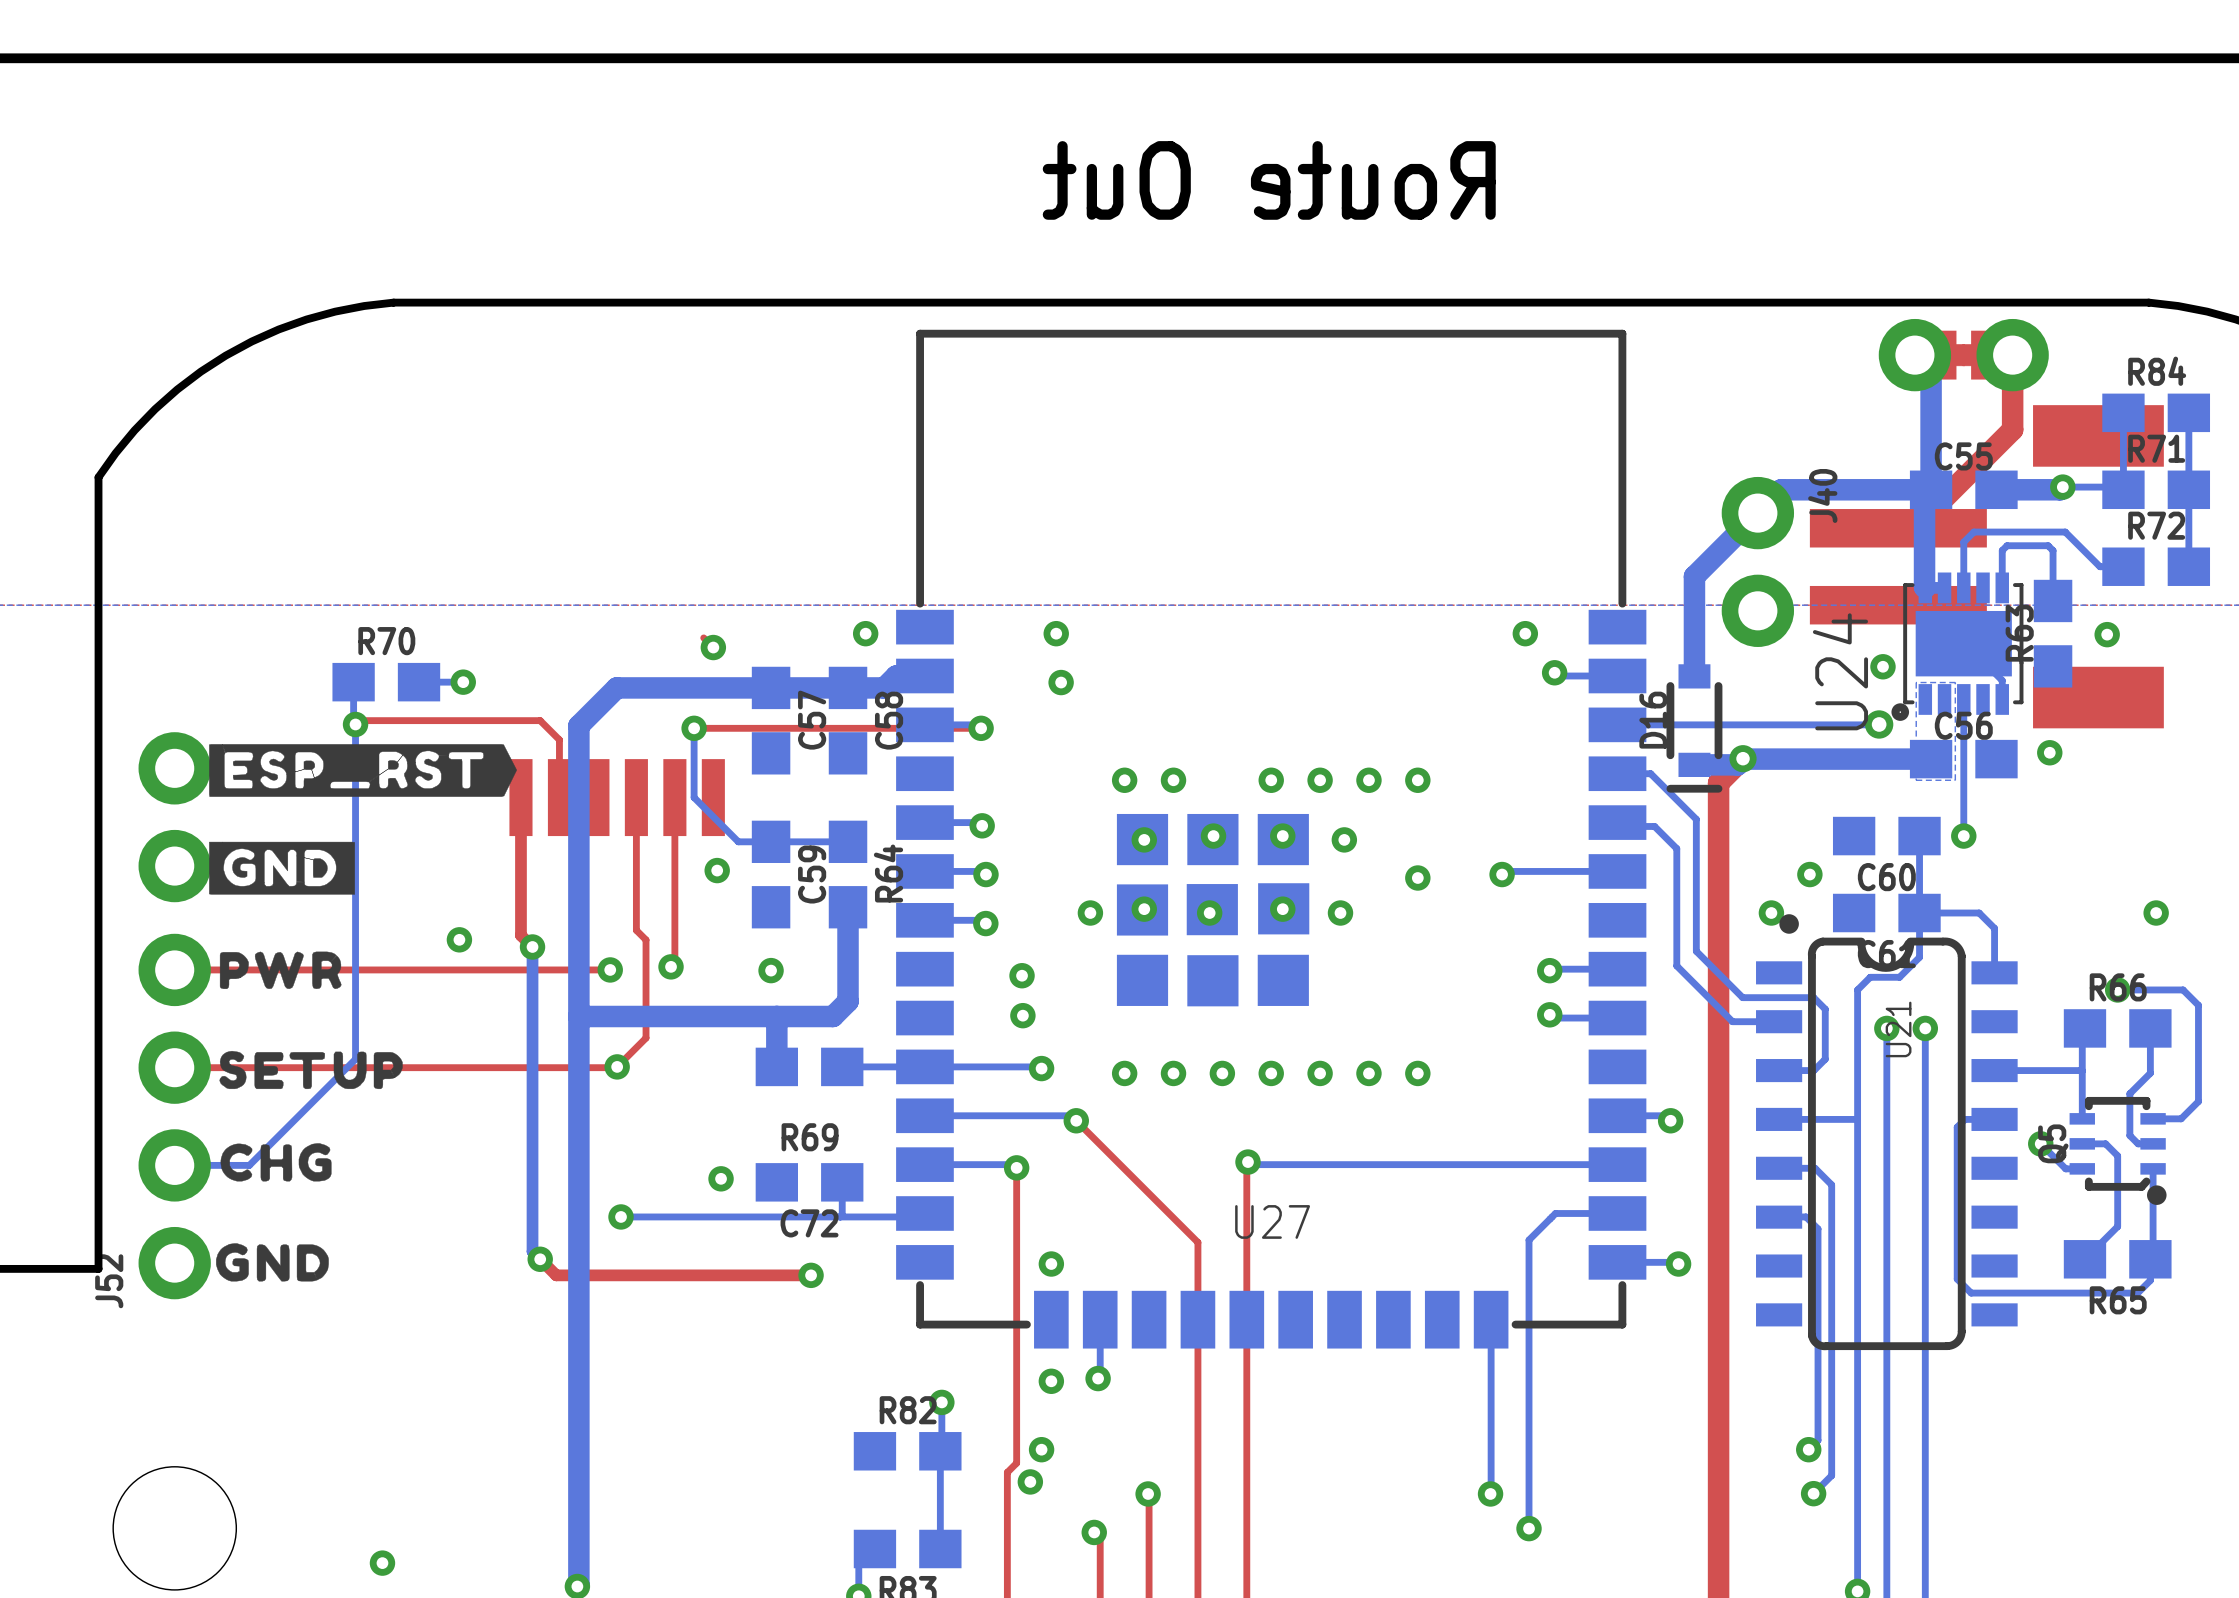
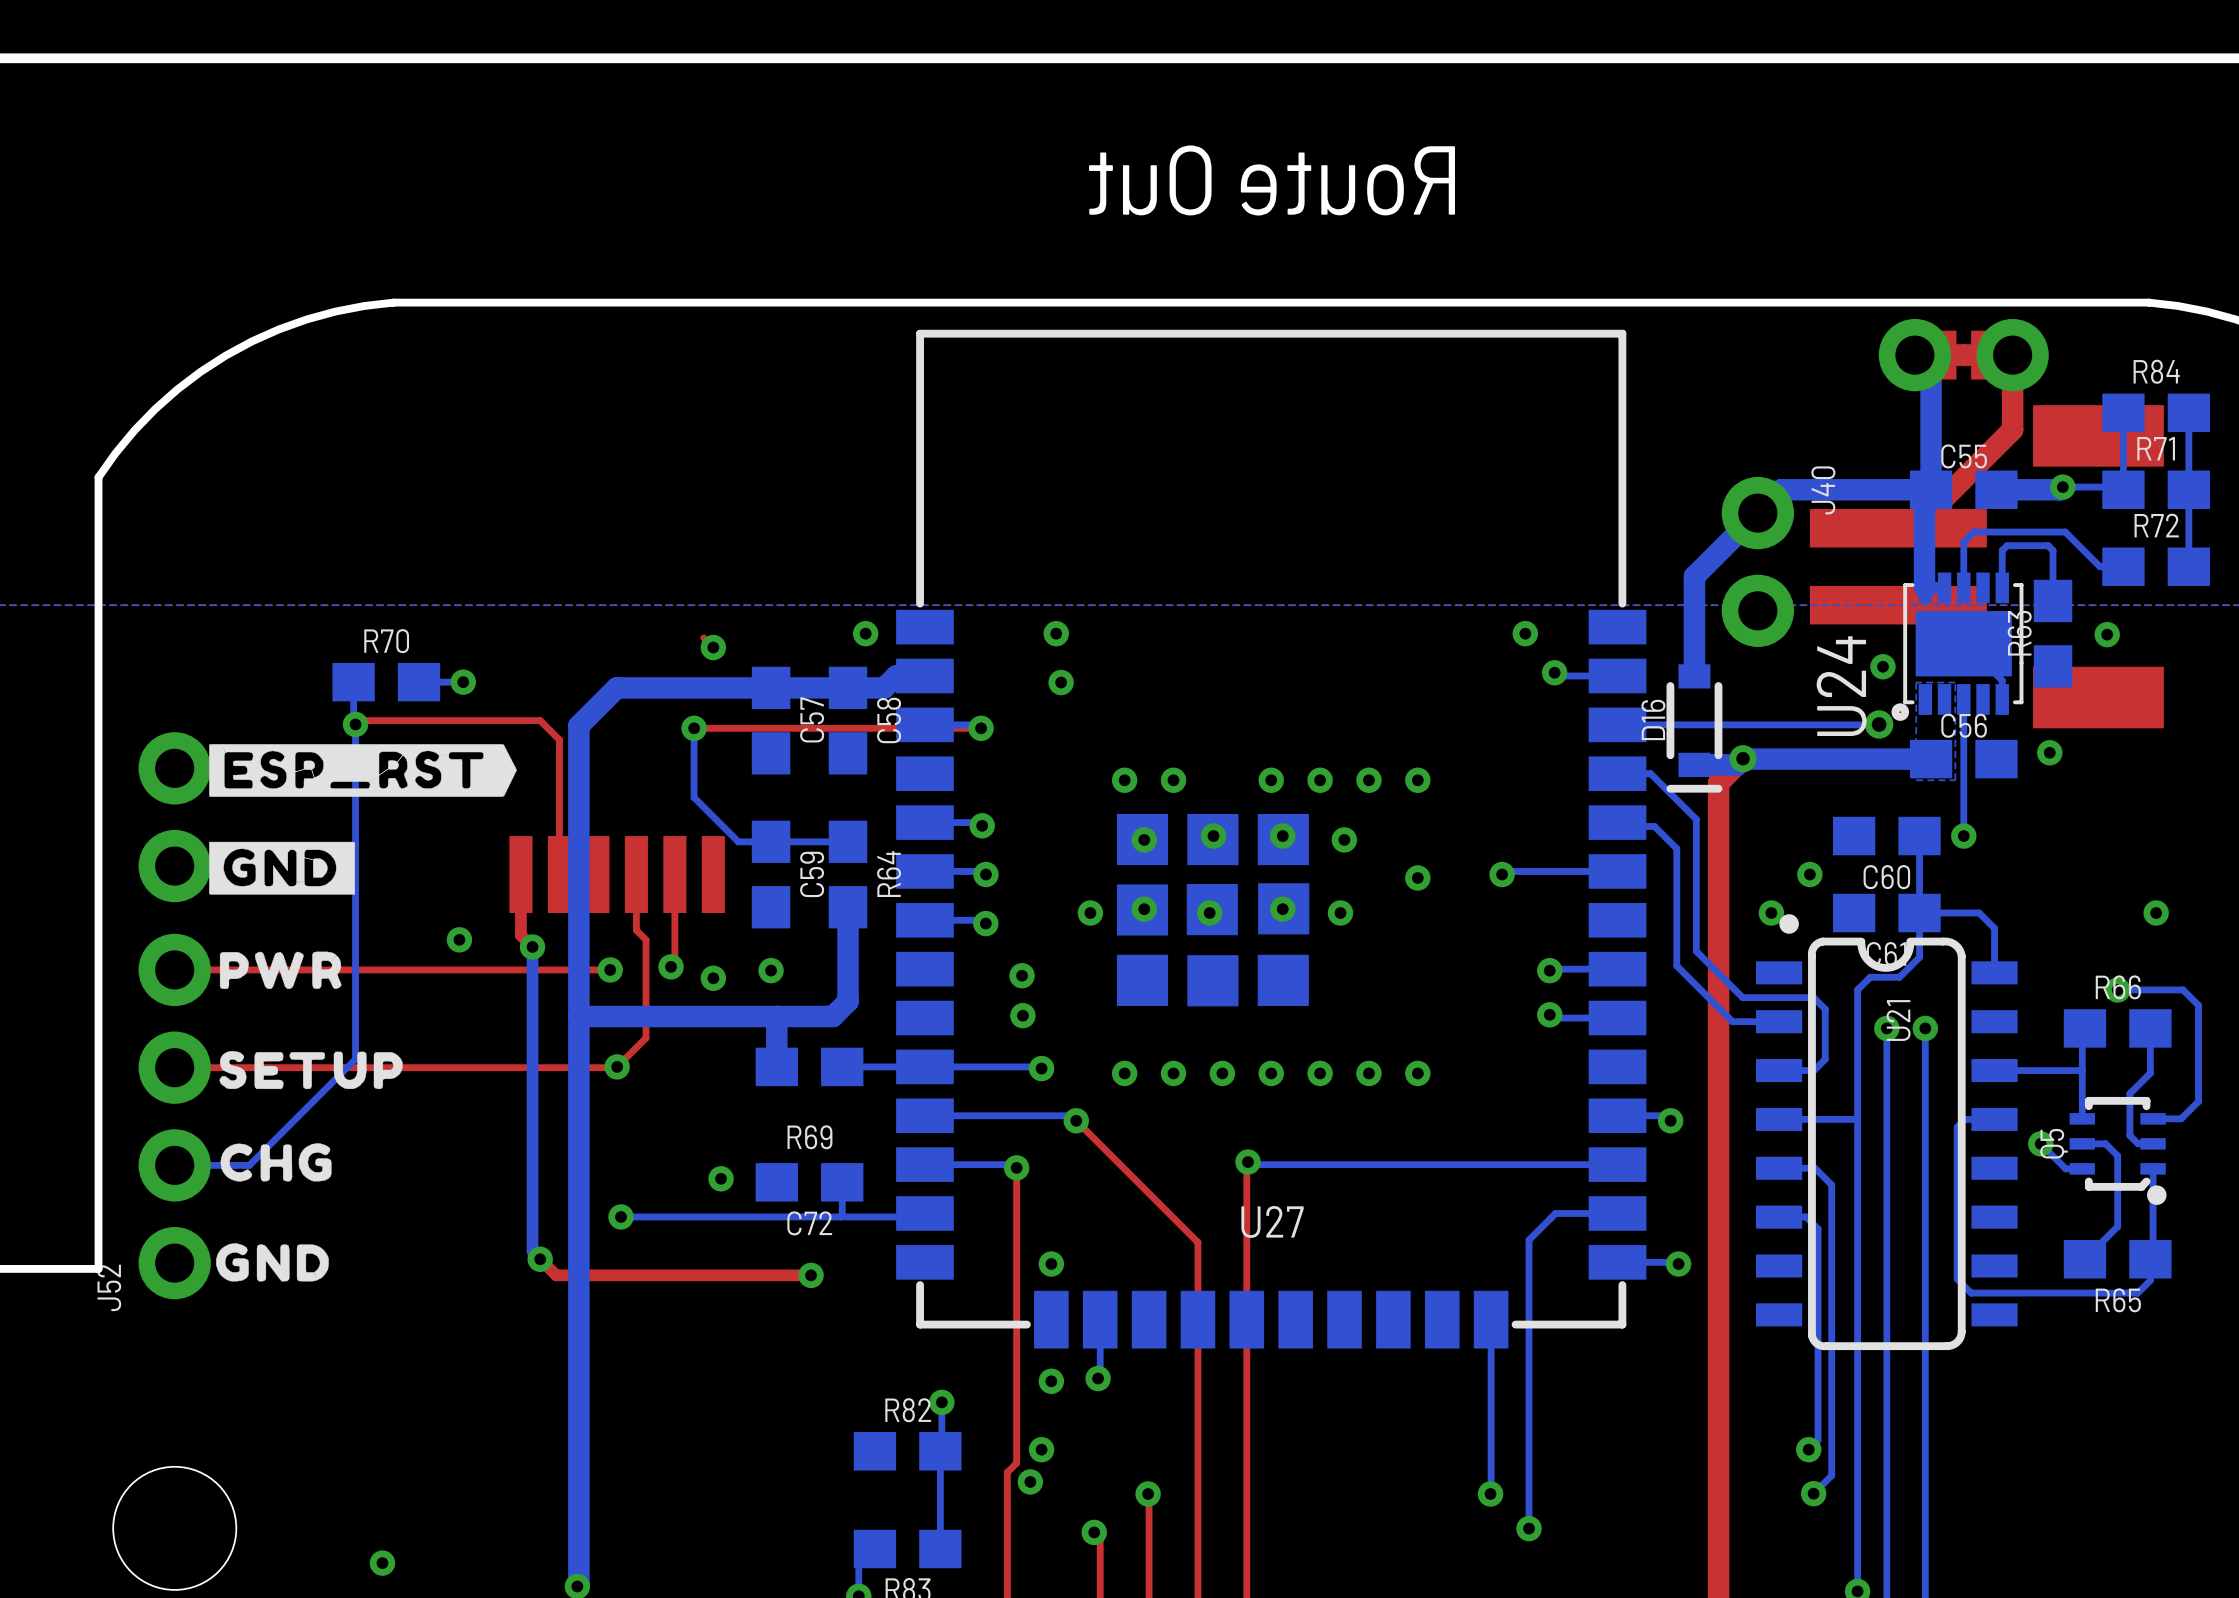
top track: (520, 797) (520, 874) -> (559, 797) (559, 874)
part position: (617, 797) -> (617, 874)
top track: (636, 797) (636, 874) -> none
top track: (674, 797) (674, 874) -> none
via position: (717, 870) -> (713, 978)

